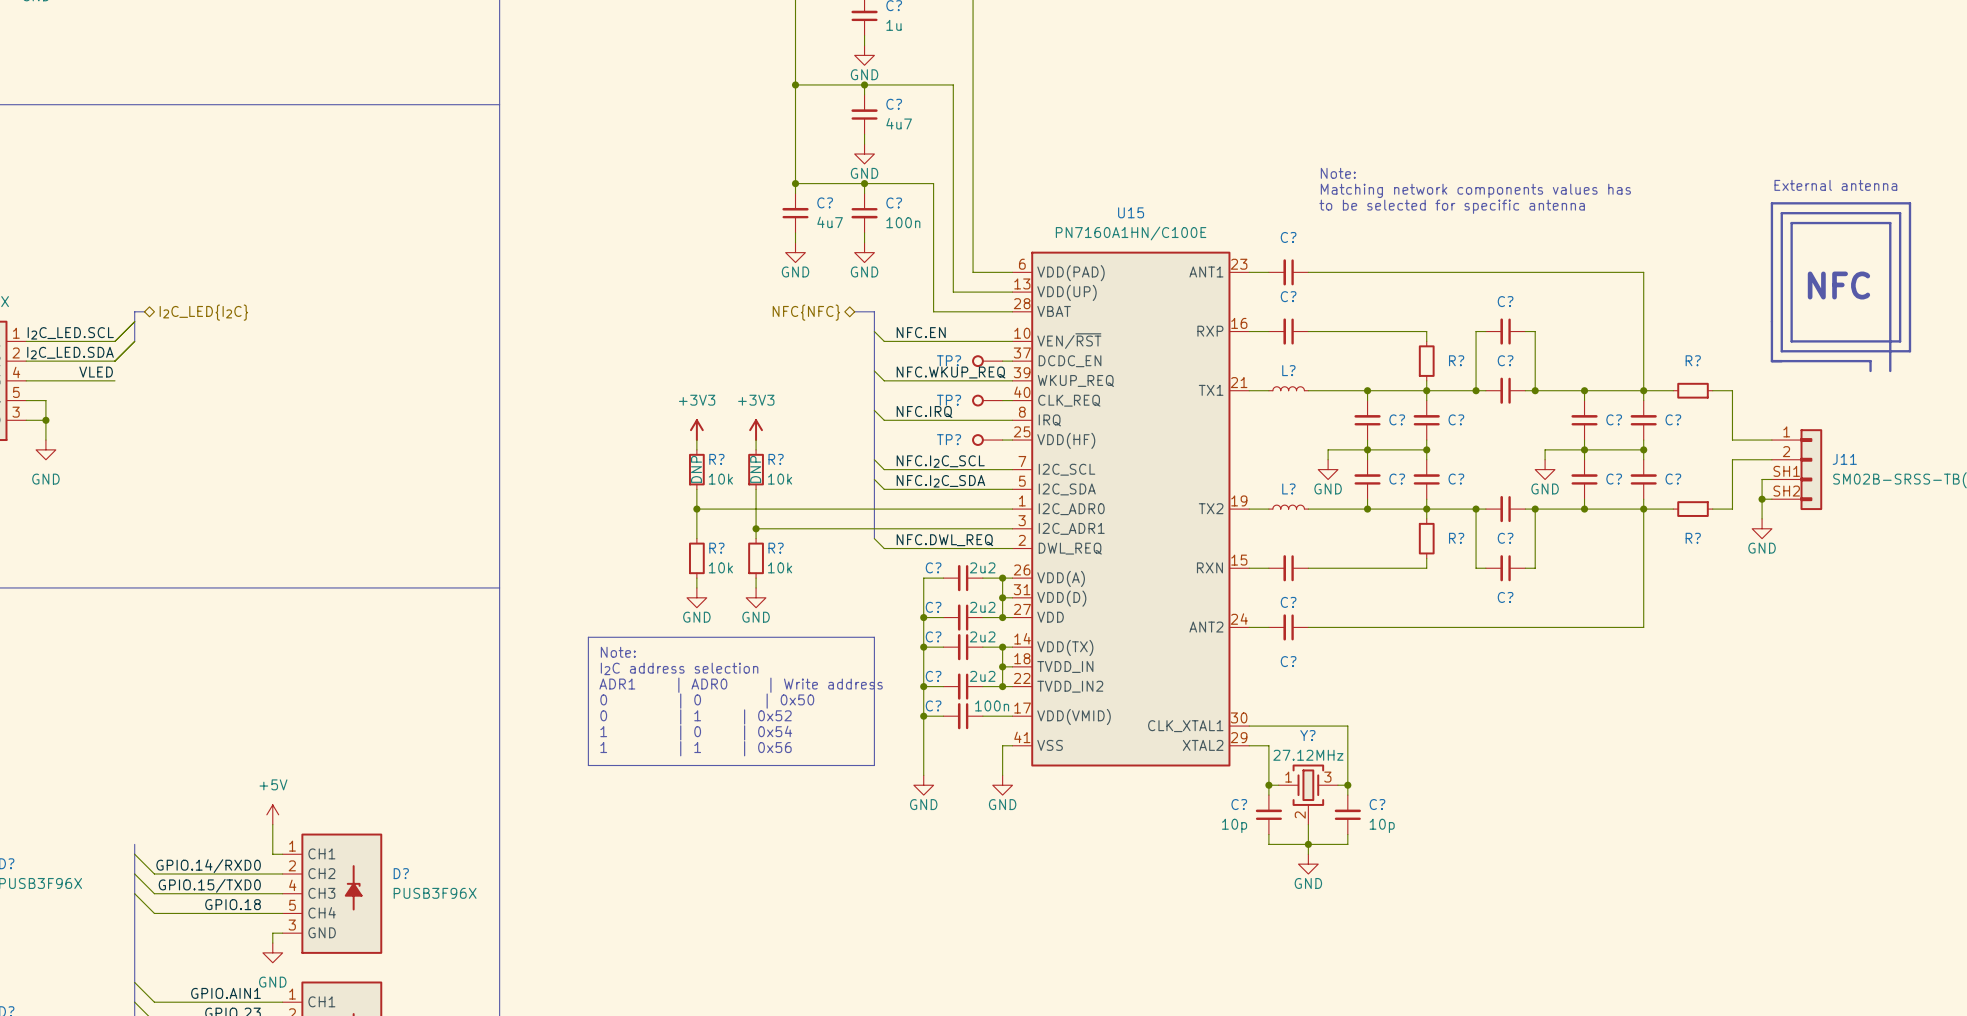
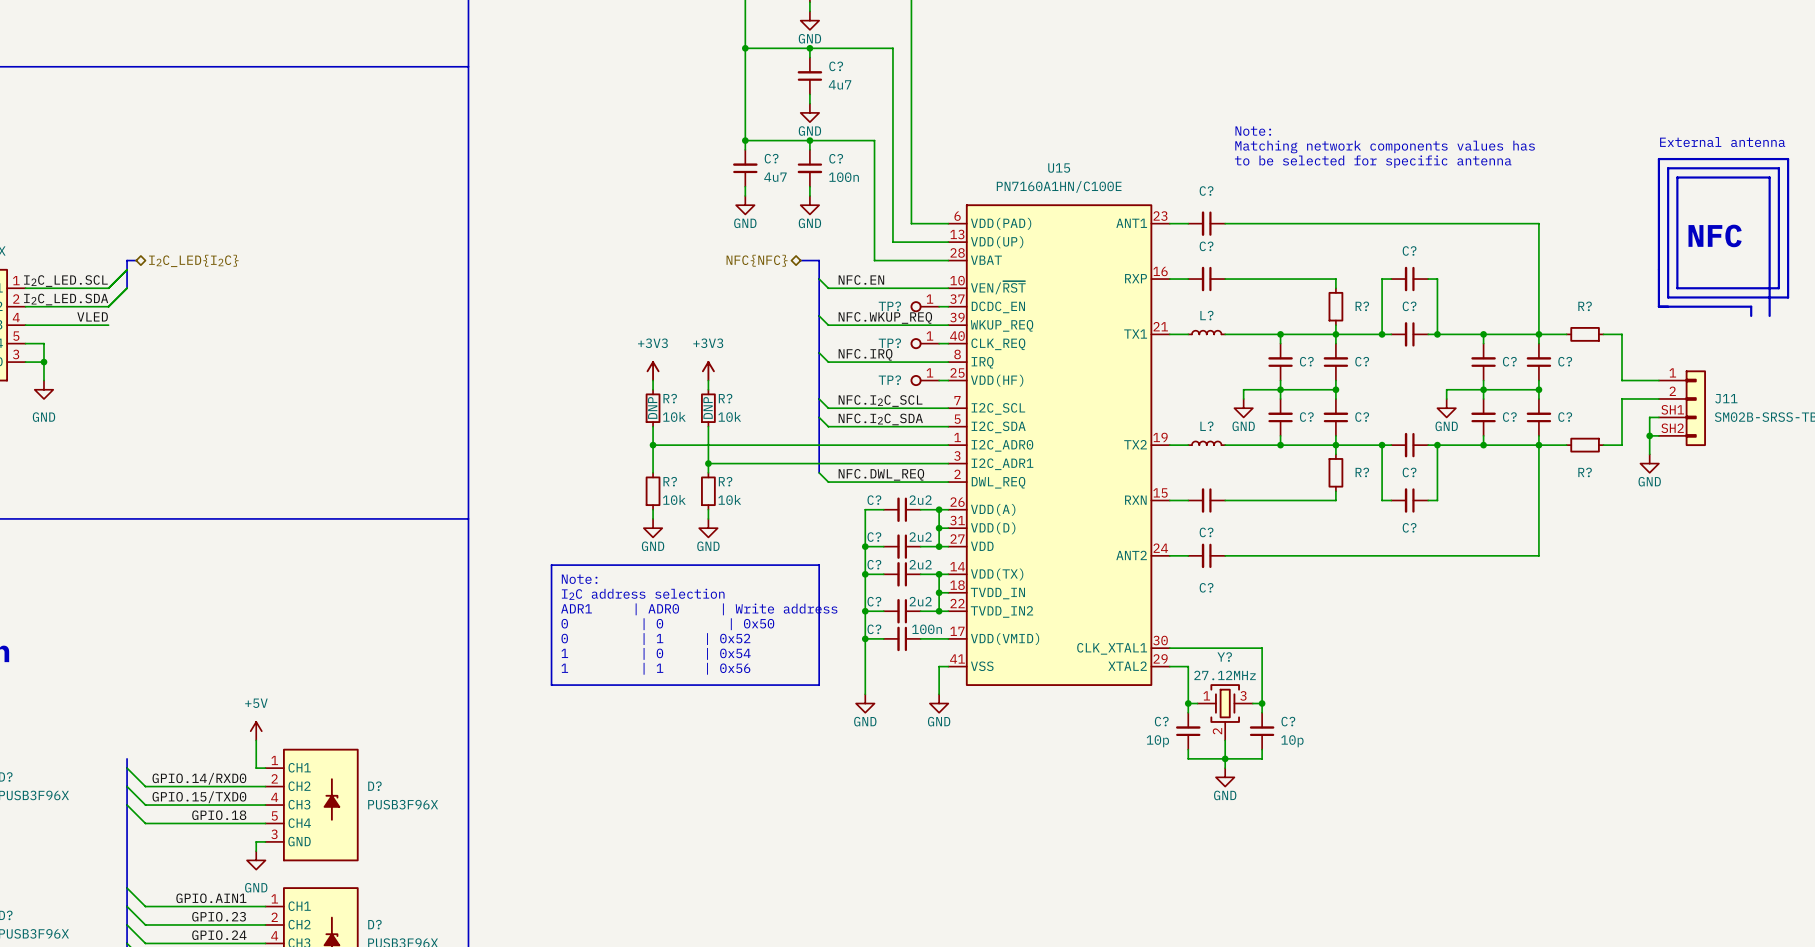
TP? pin number: none -> 1 (929, 299)
TP? pin number: none -> 1 (929, 336)
TP? pin number: none -> 1 (929, 372)

